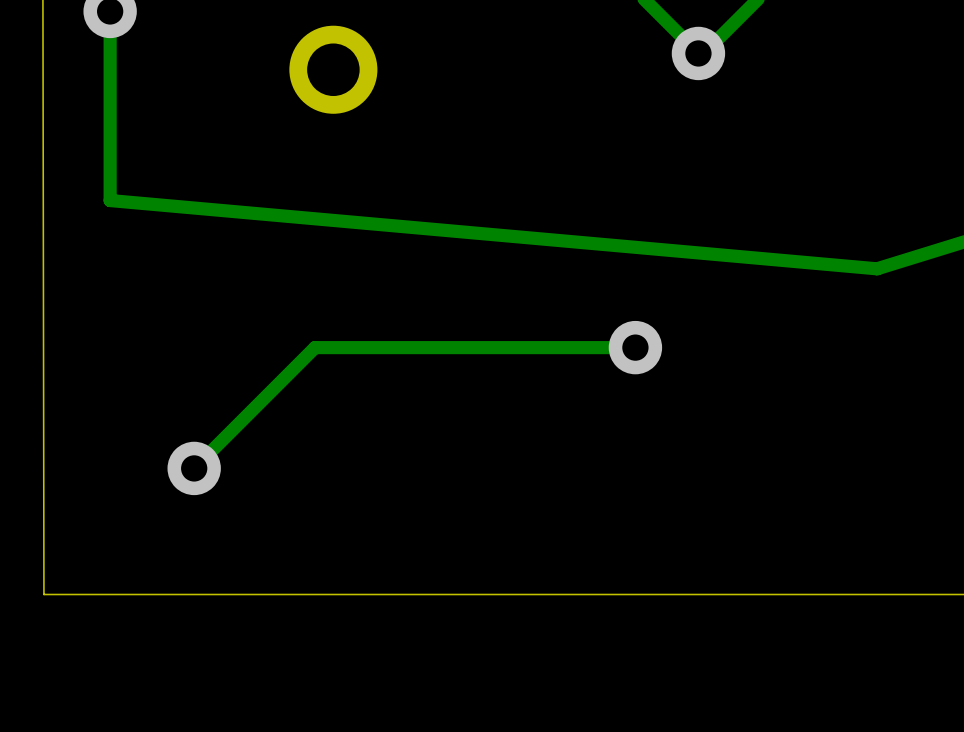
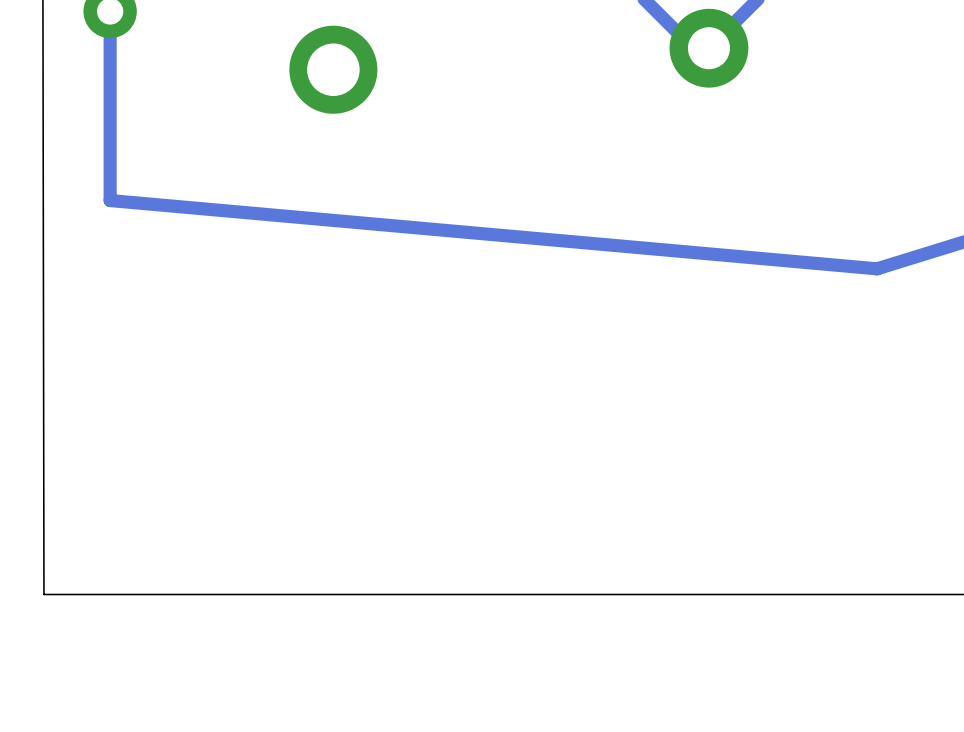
via size: [671, 26, 726, 81] -> [669, 8, 749, 88]
track: (635, 347) (315, 347) (194, 468) -> none
via: (635, 347) -> none
via: (194, 468) -> none

